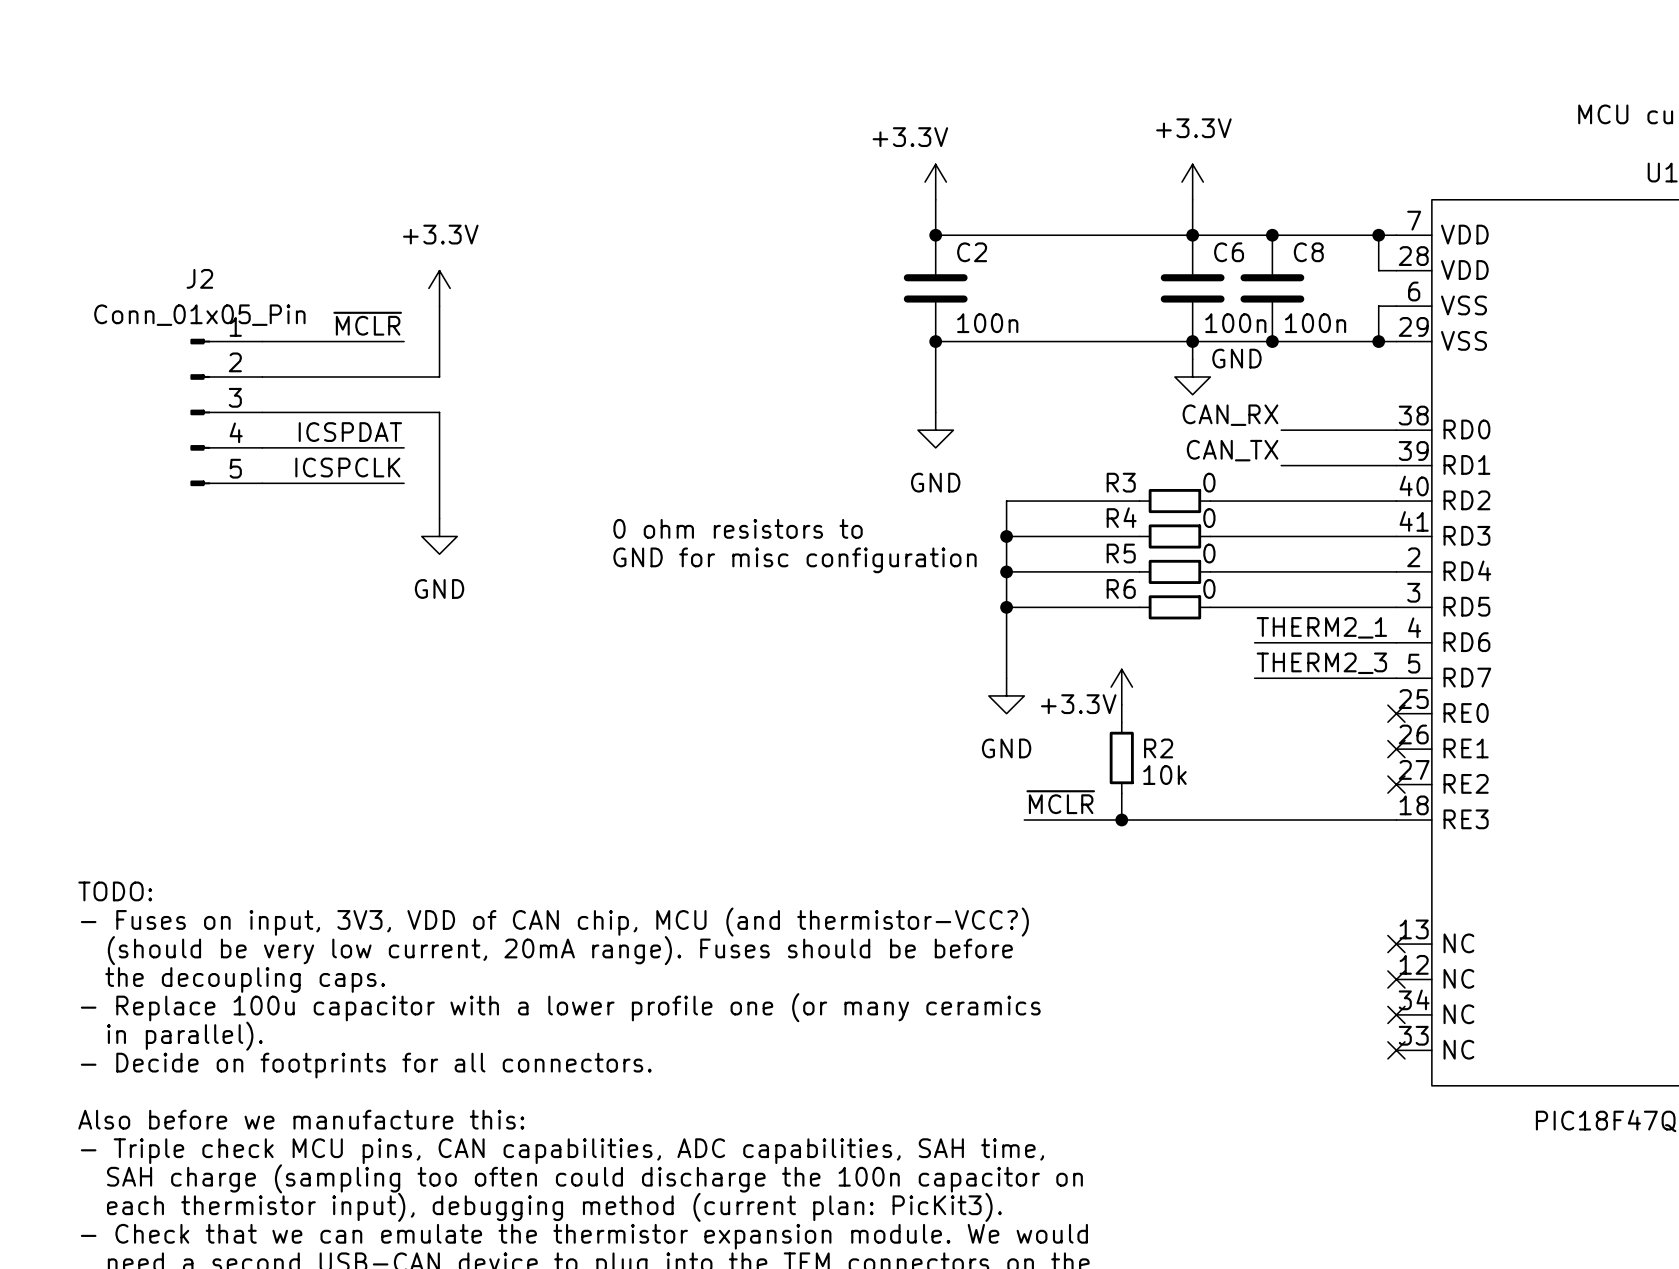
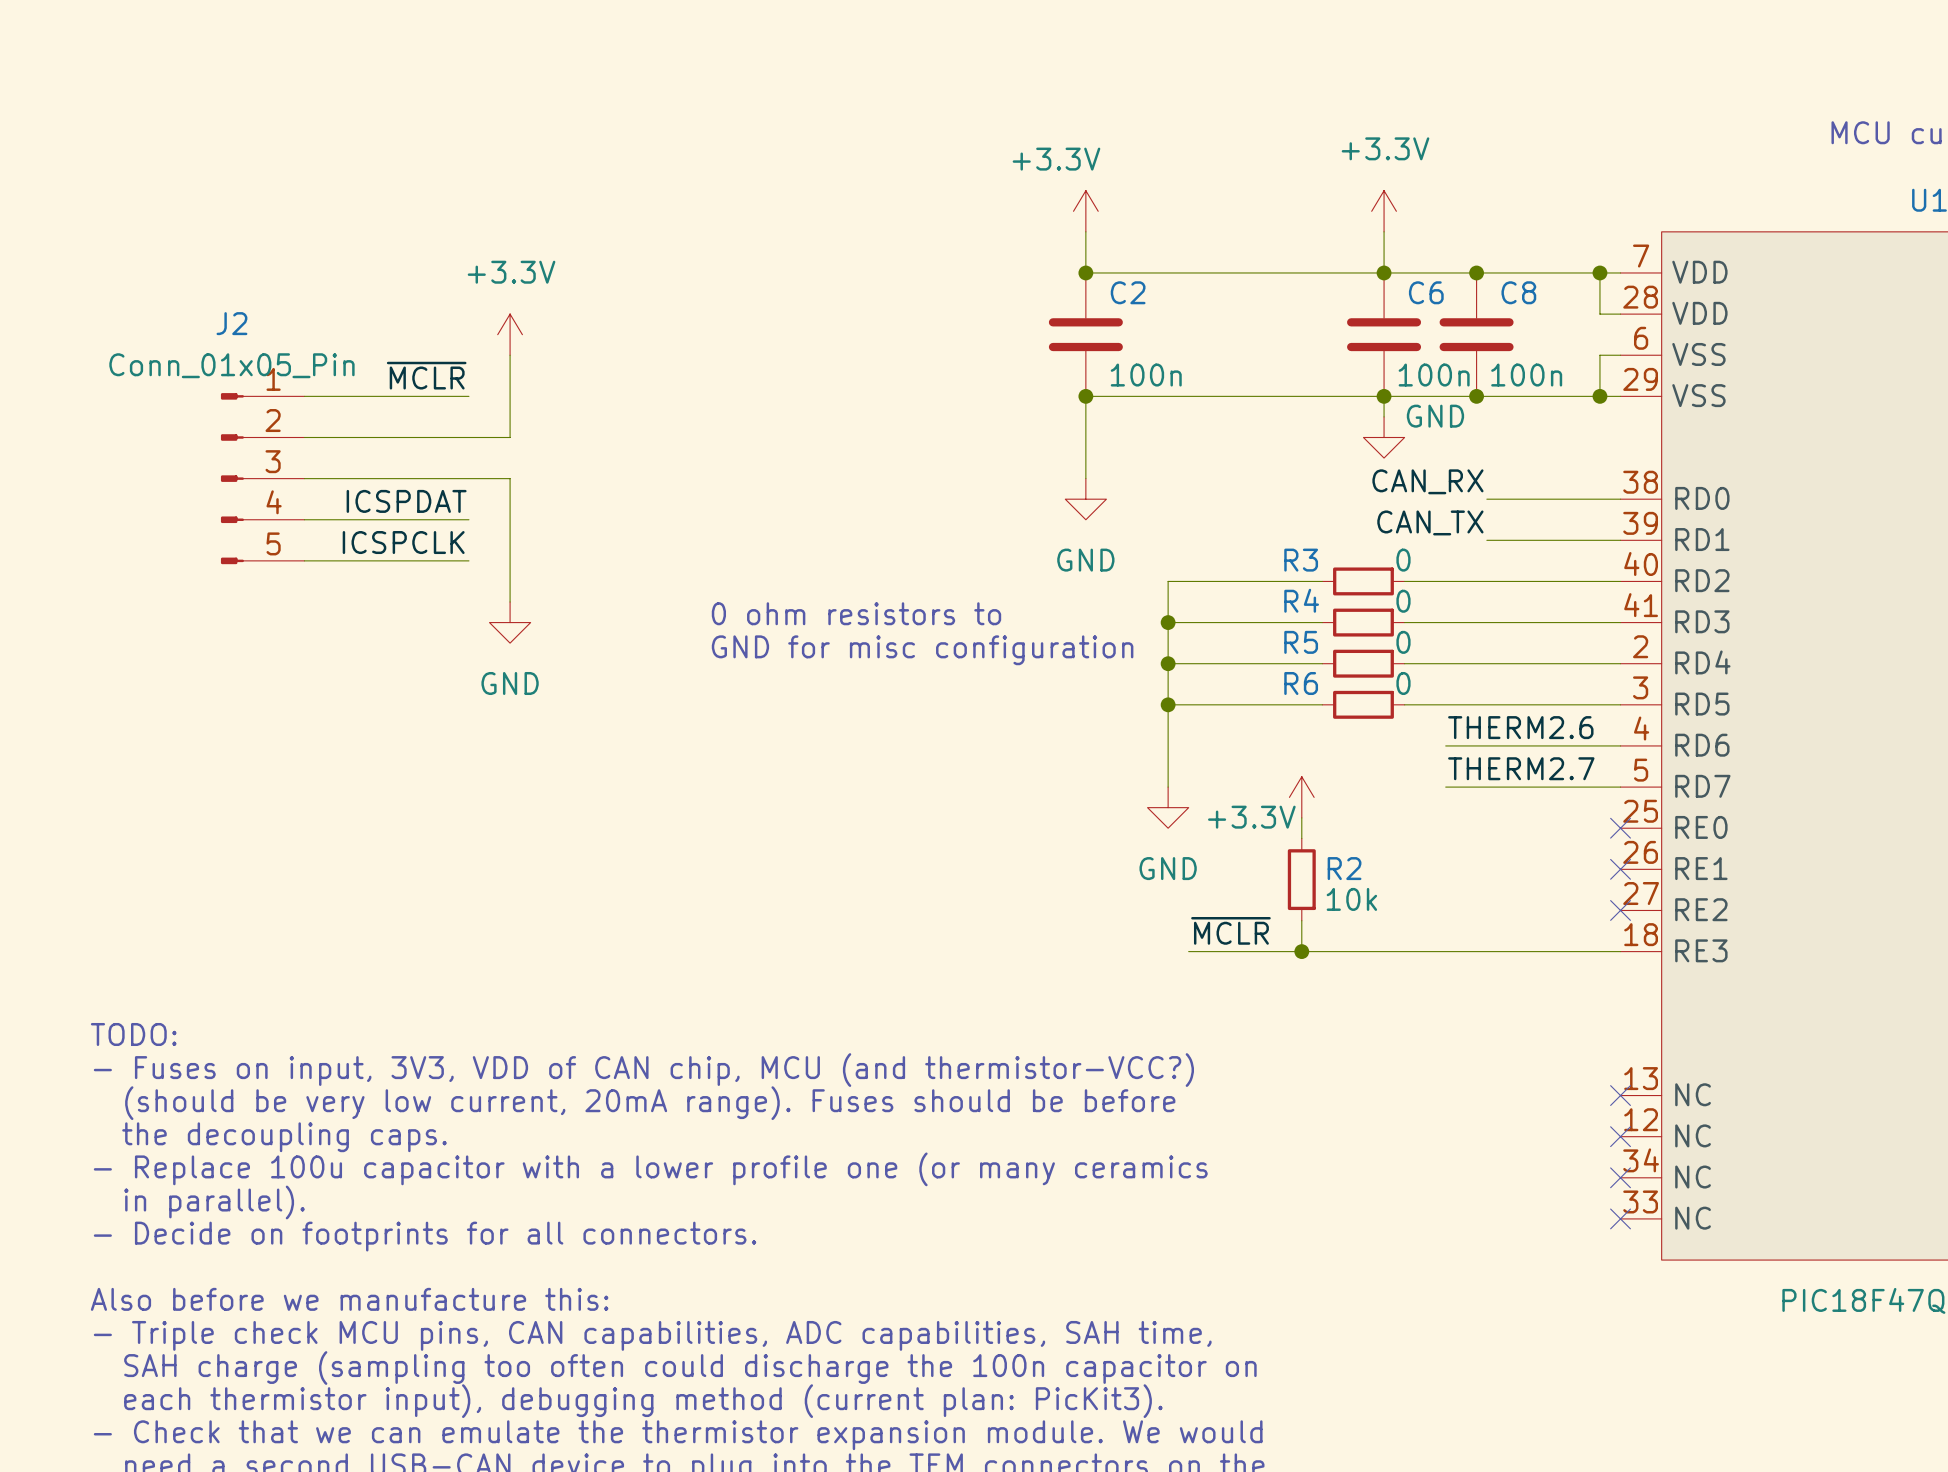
label: THERM2_1 (1321, 627) -> THERM2.6 (1520, 727)
wire: none -> (1445, 745) (1456, 745)
label: THERM2_3 (1321, 663) -> THERM2.7 (1521, 768)
wire: none -> (1445, 787) (1456, 787)

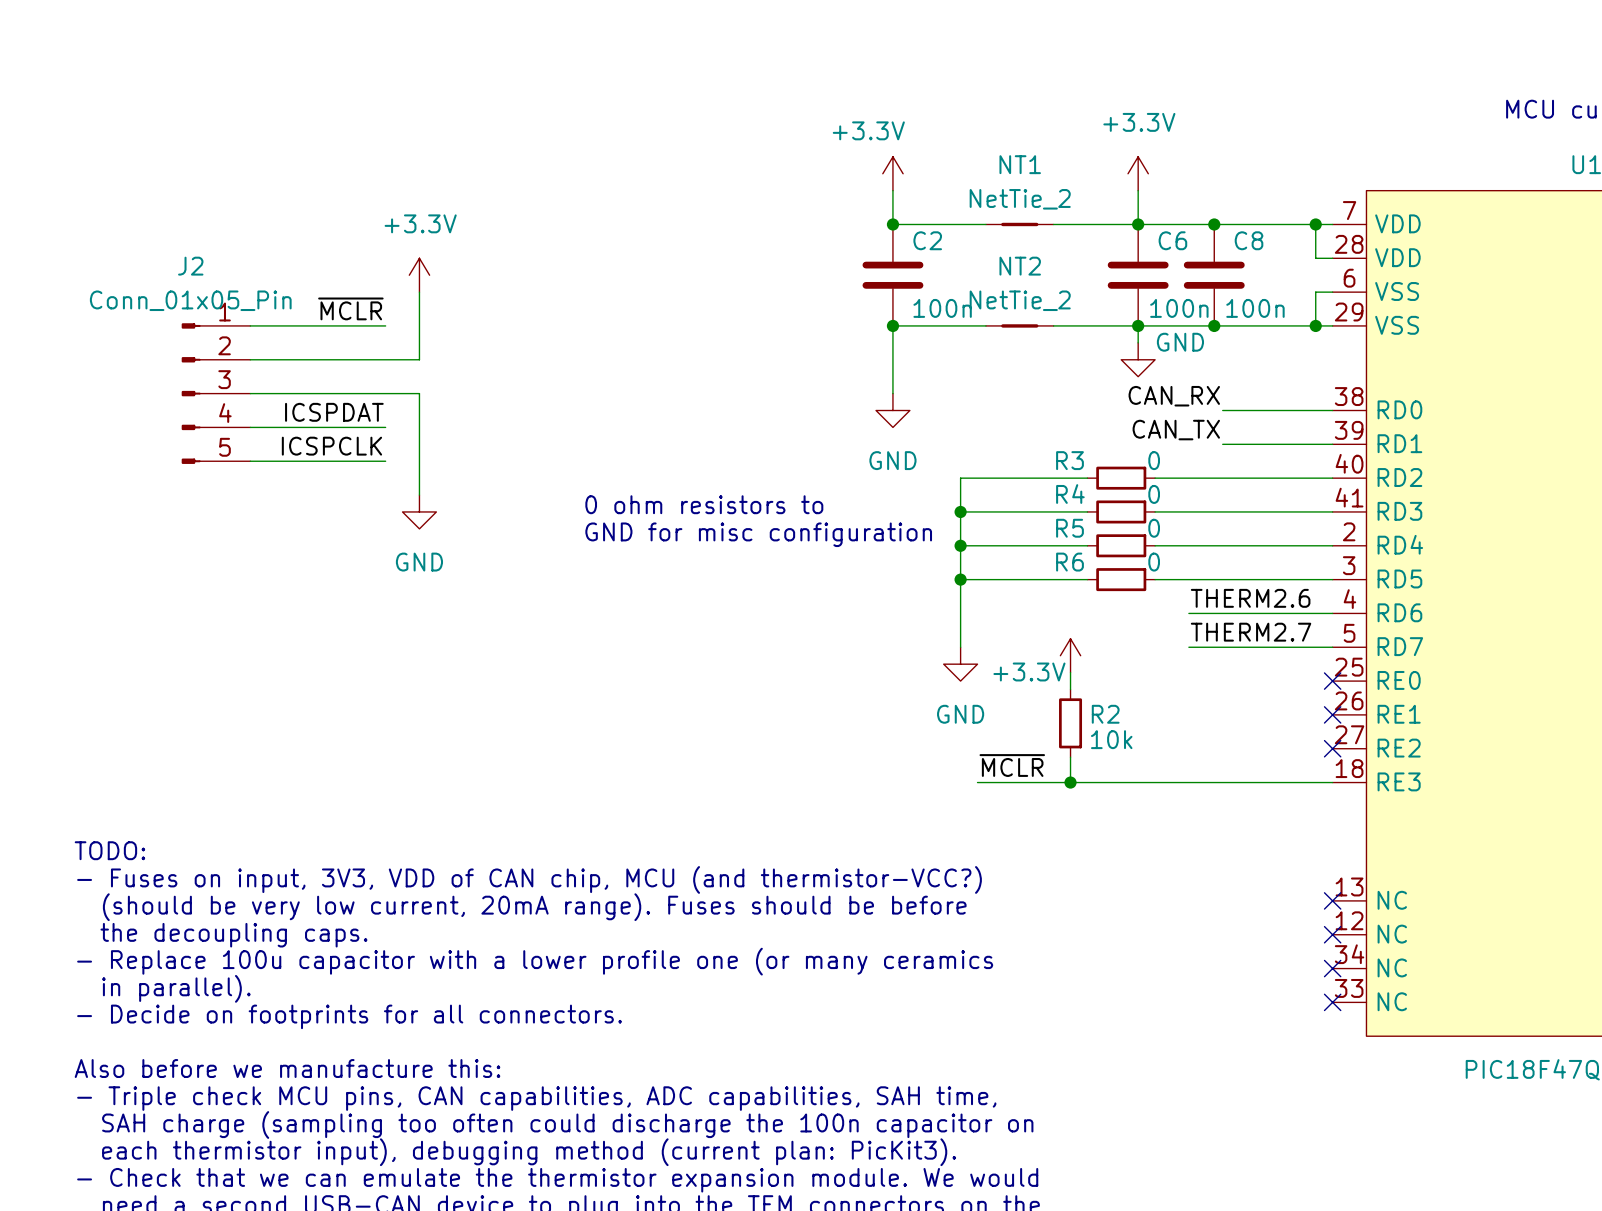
NT1: none -> NetTie_2 (1019, 224)
NT2: none -> NetTie_2 (1019, 325)

